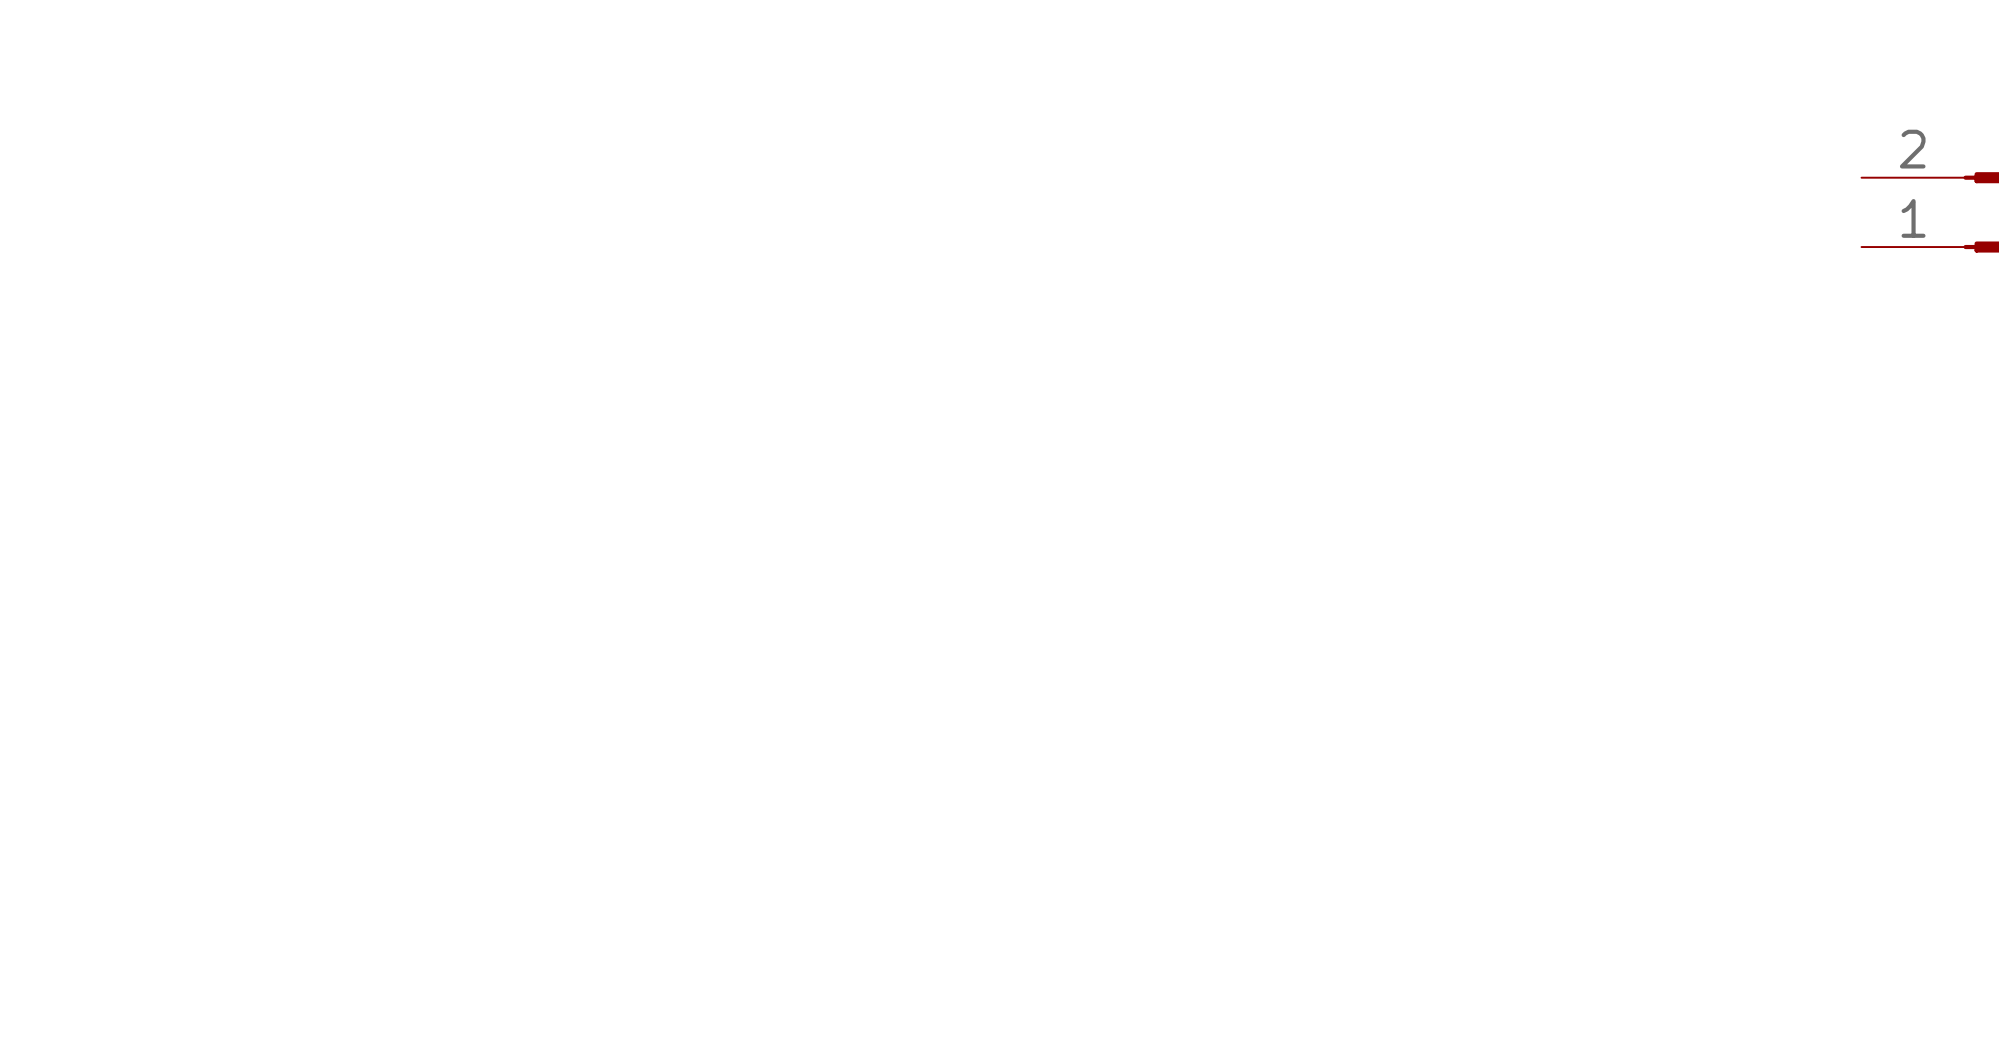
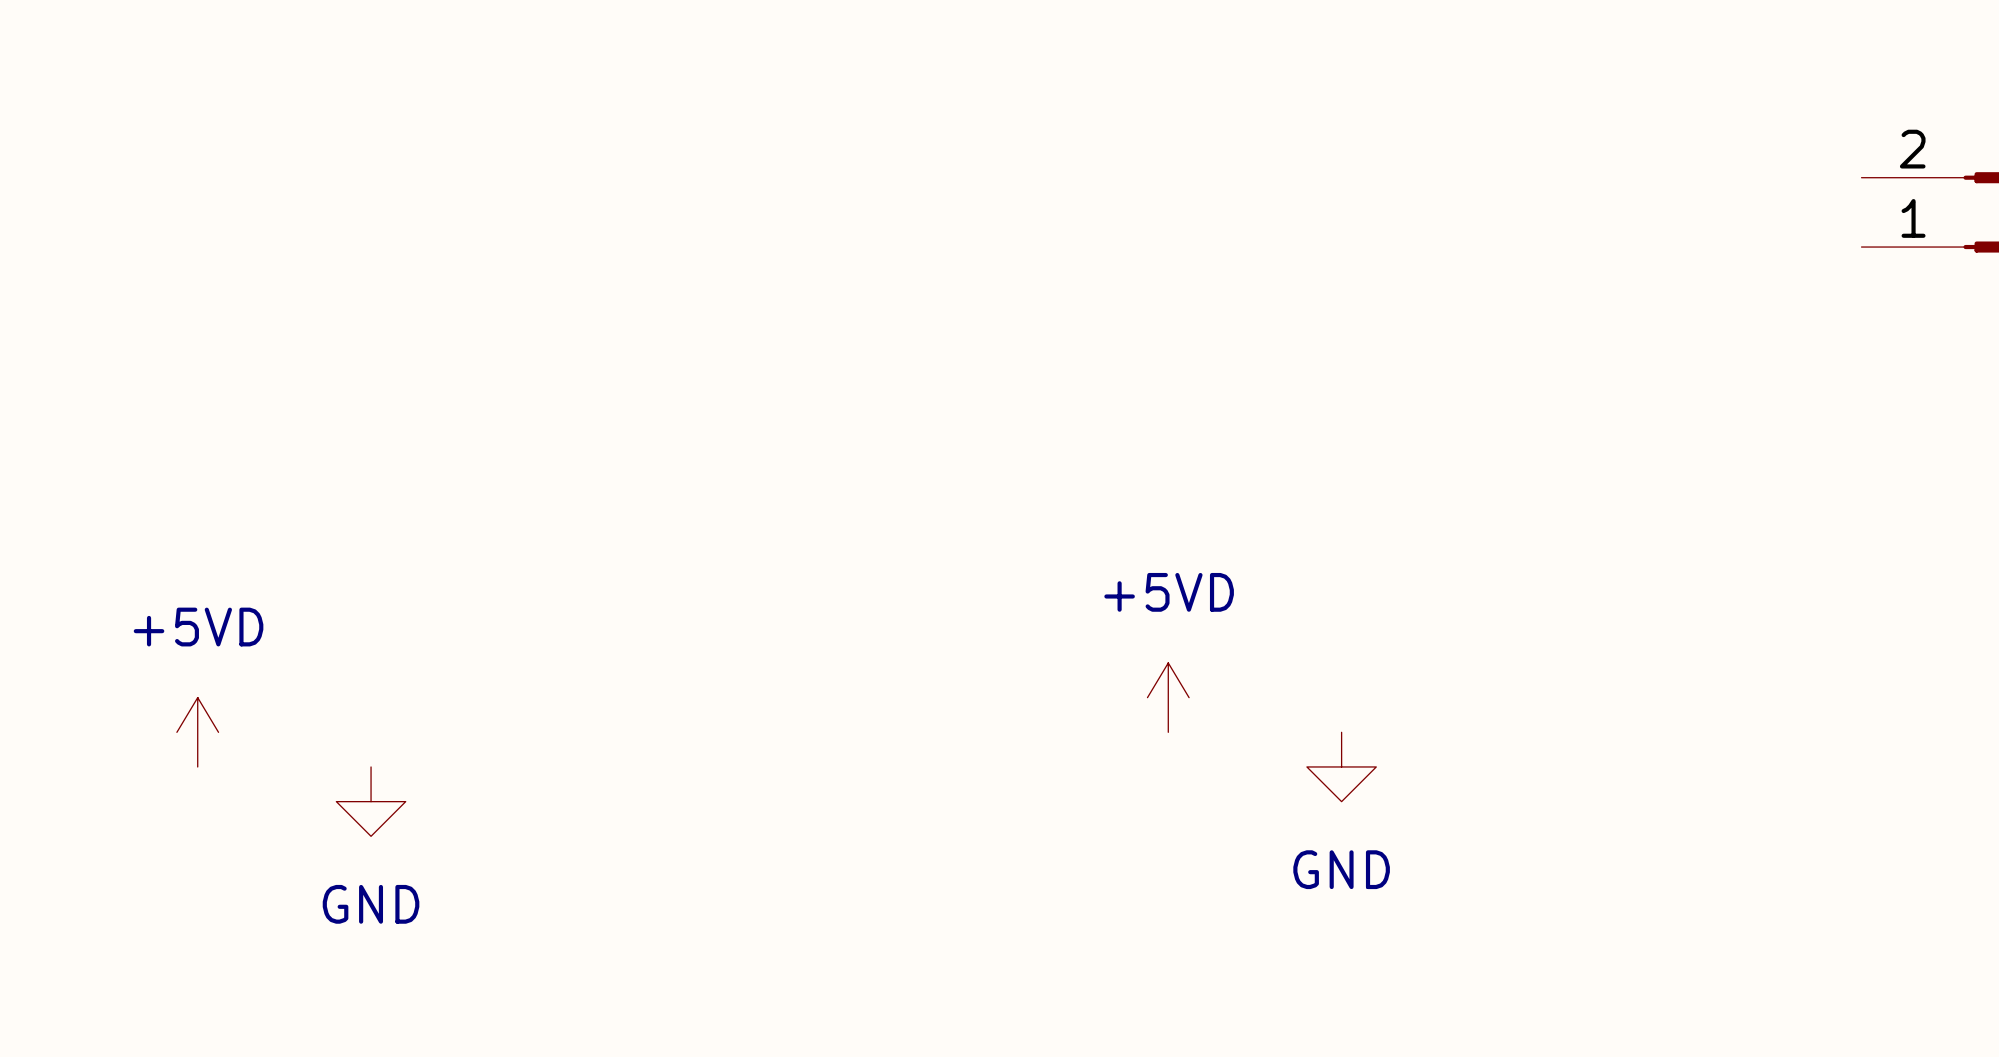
power symbol: none -> +5VD (1168, 697)
power symbol: none -> +5VD (197, 732)
power symbol: none -> GND (1341, 766)
power symbol: none -> GND (371, 801)

